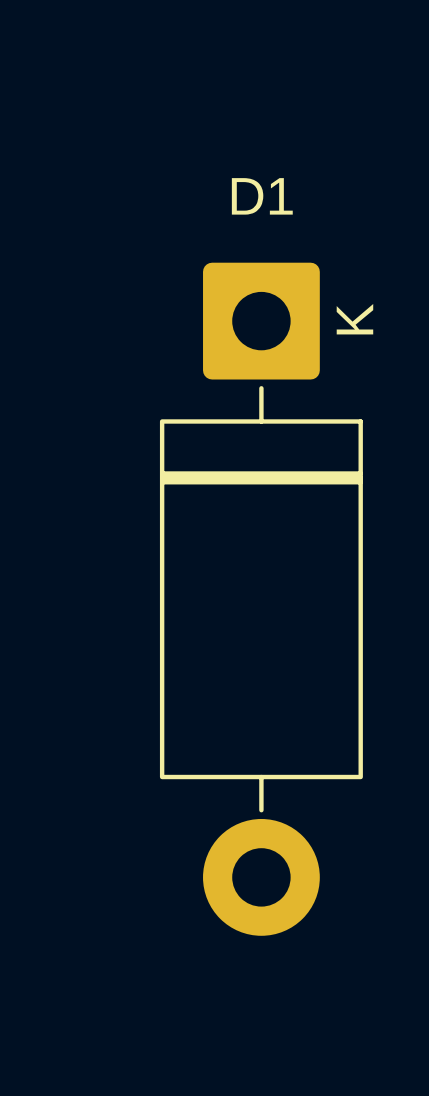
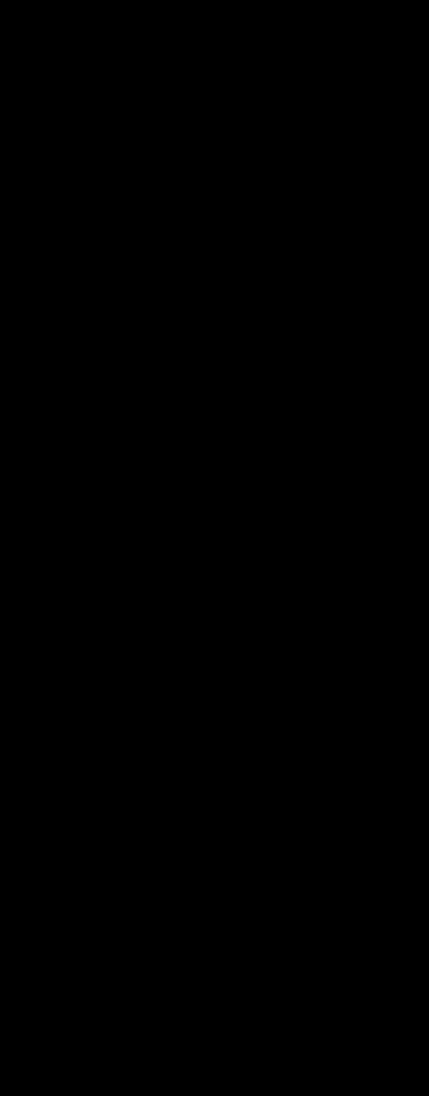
D1: (261, 599) -> none

